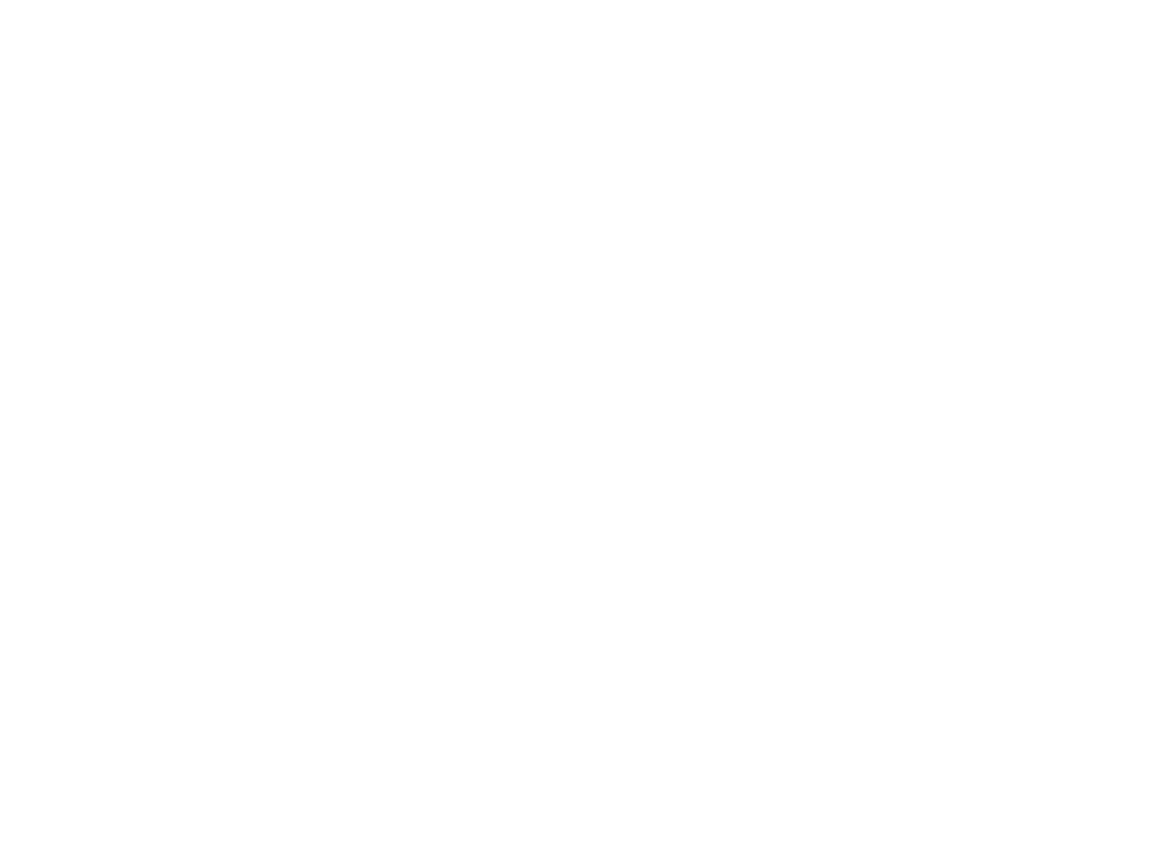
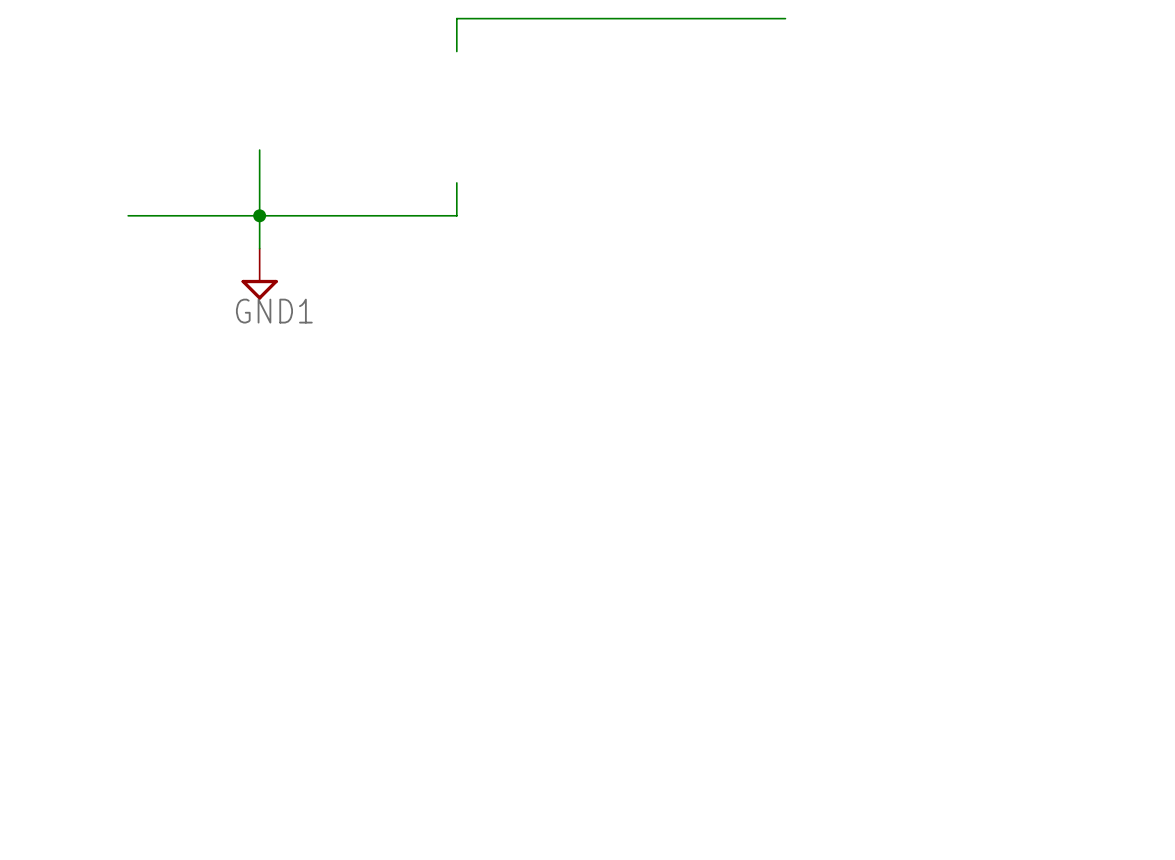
wire: none -> (785, 18) (456, 18) (456, 51)
wire: none -> (259, 150) (259, 248)
wire: none -> (456, 182) (456, 215) (128, 215)
junction: none -> (259, 215)
power symbol: none -> GND1 (259, 274)

